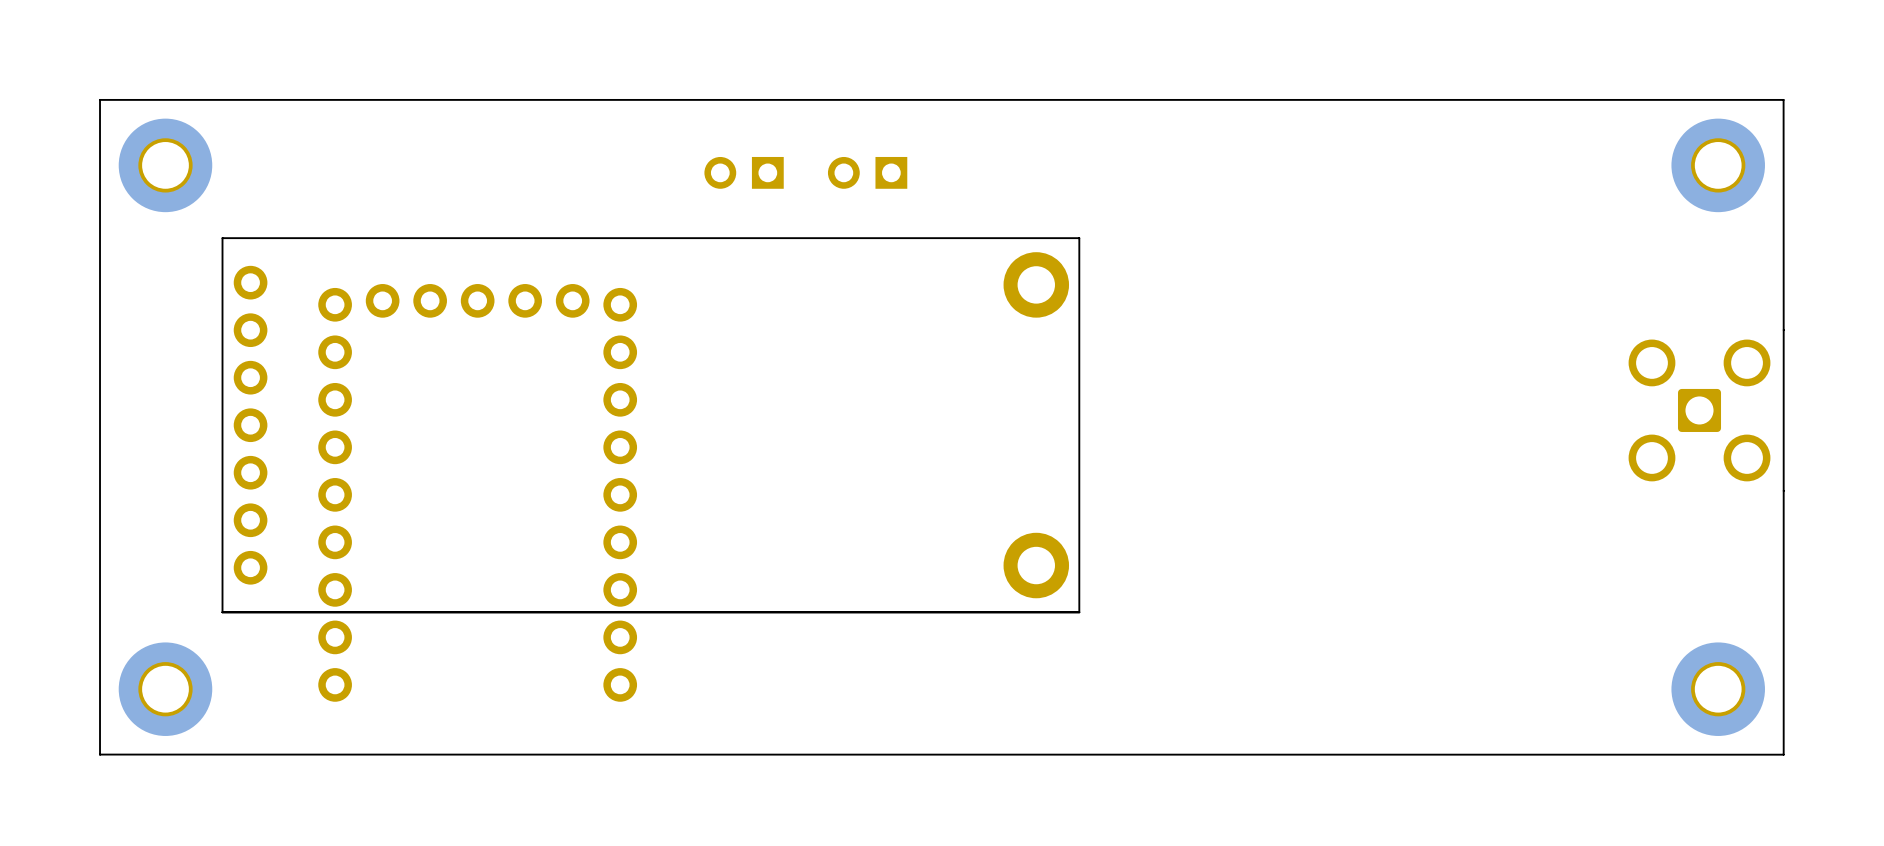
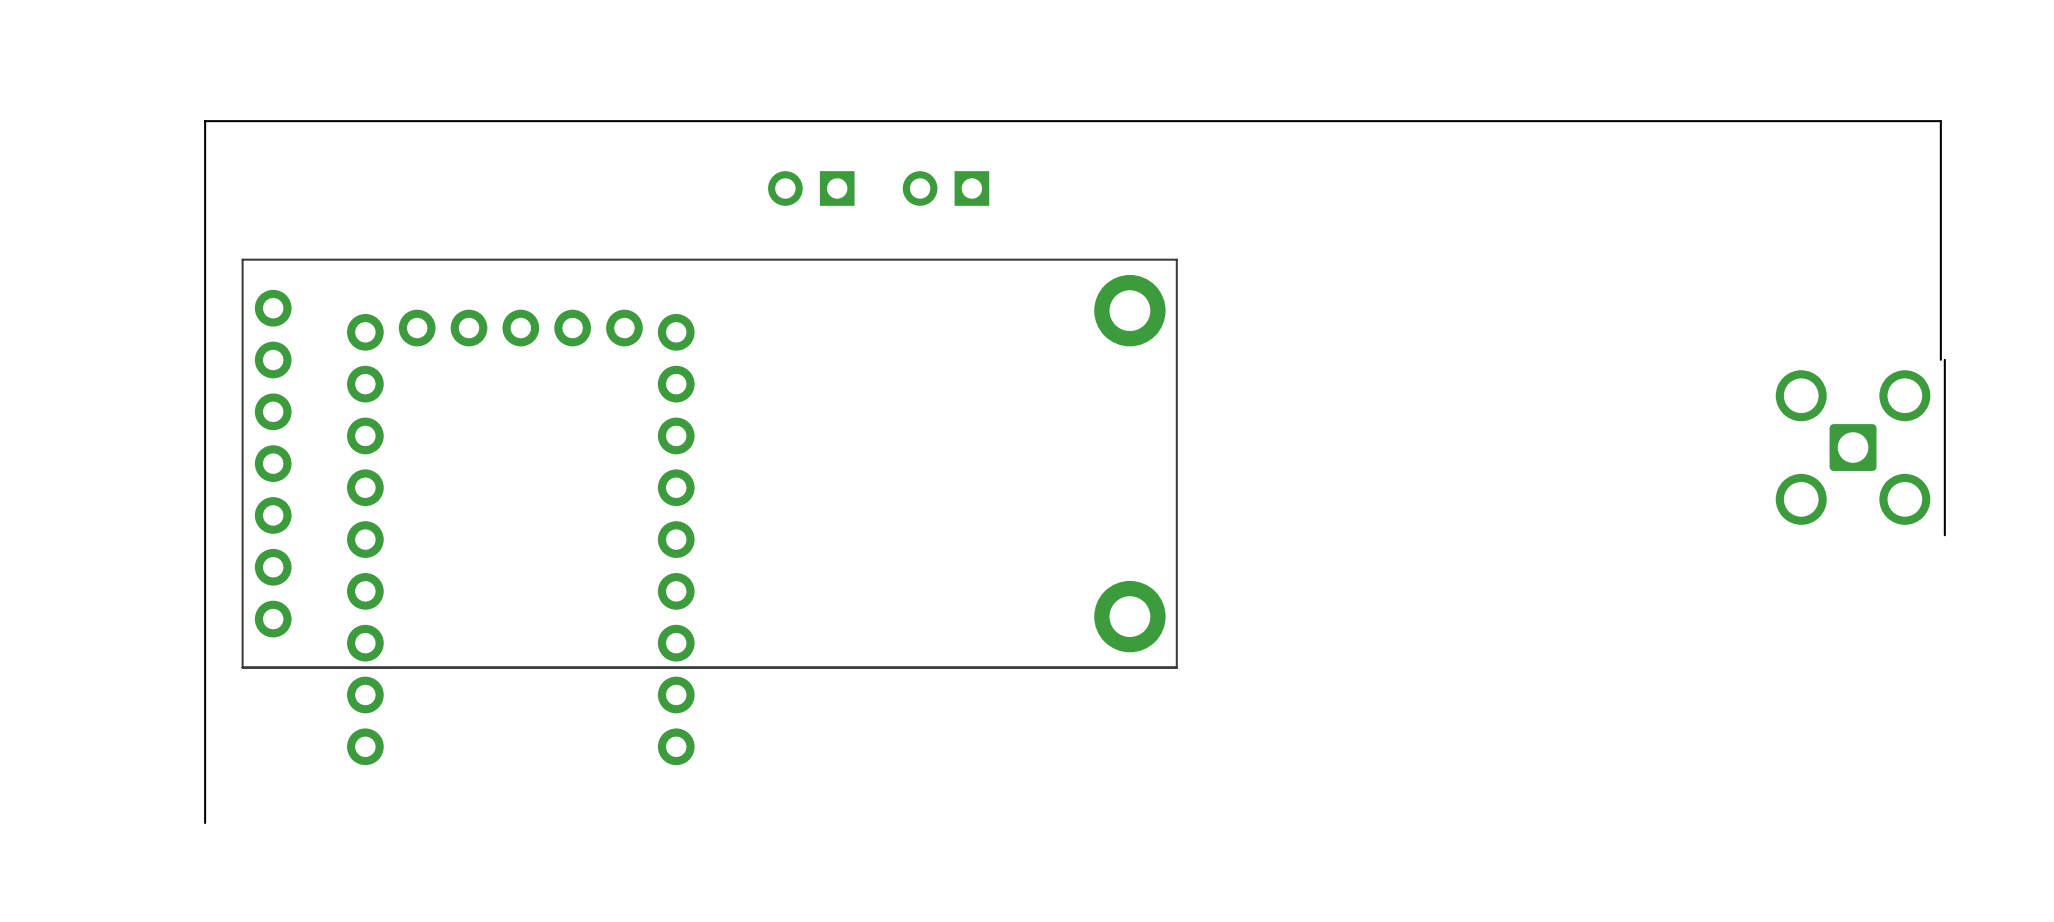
board edge: (99, 99) (1783, 99) (1783, 330) -> none
board edge: (100, 99) (100, 754) -> none
part: (165, 165) -> none
part: (1718, 165) -> none
board edge: none -> (1940, 359) (1940, 121) (205, 121) (205, 822)
board edge: (1783, 490) (1783, 754) (100, 754) -> none
part: (165, 689) -> none
part: (1718, 689) -> none

